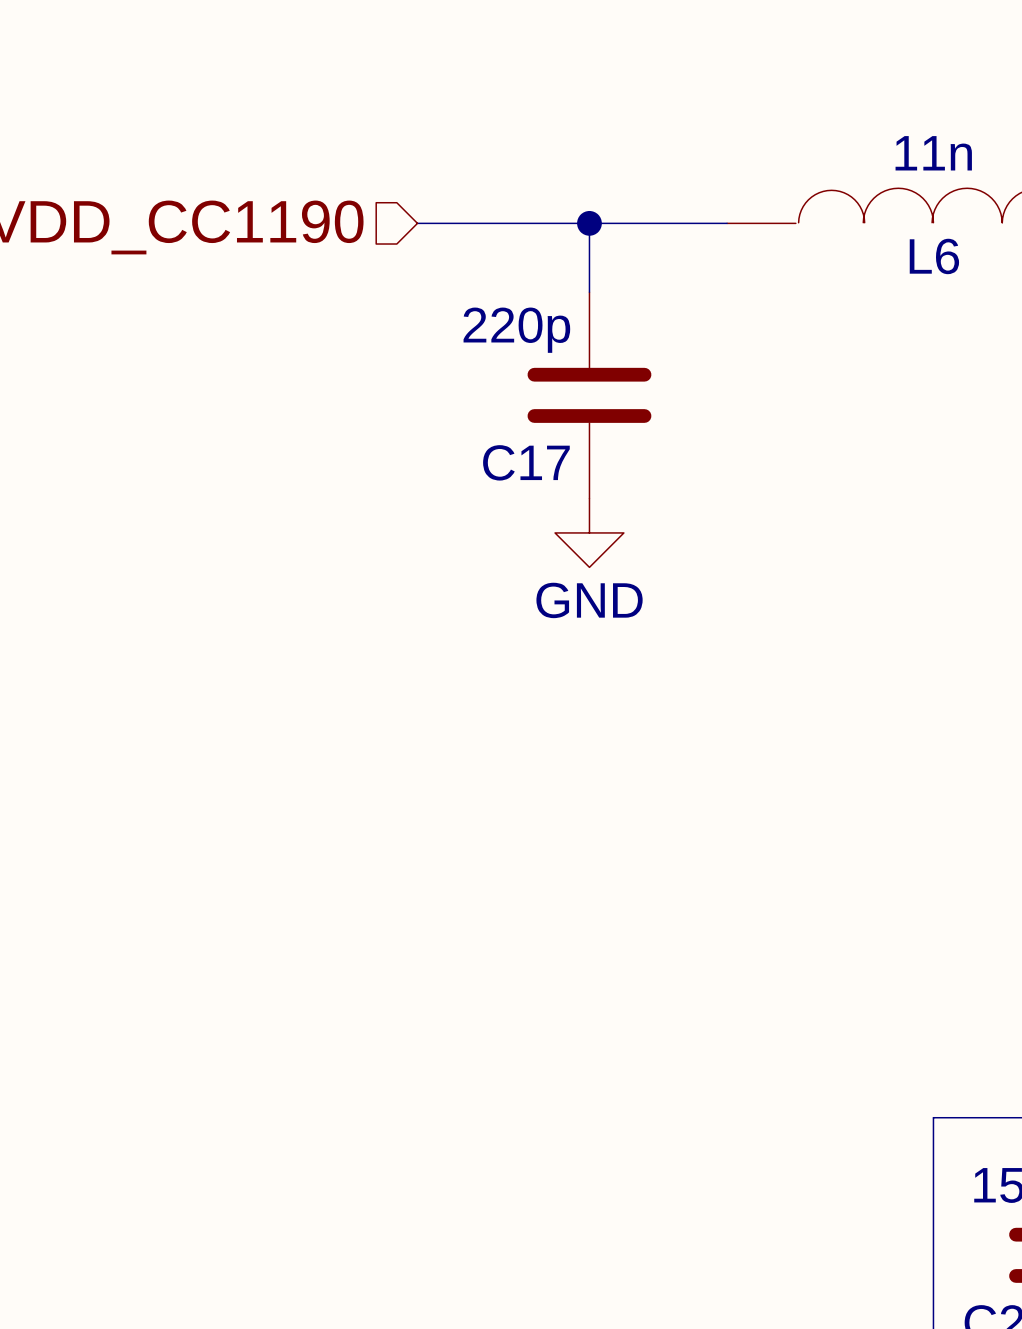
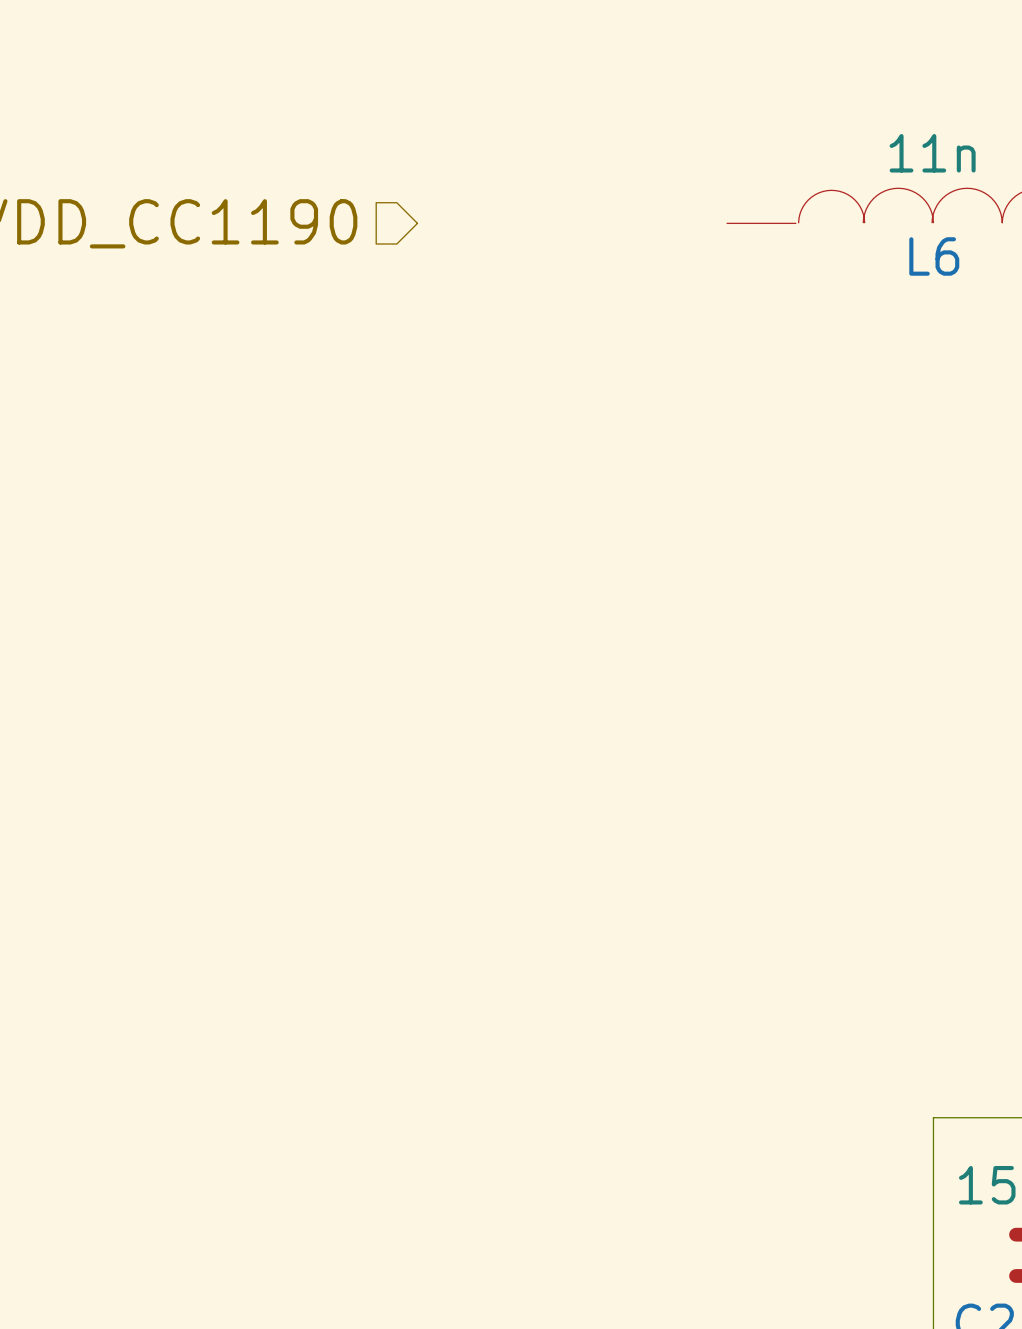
wire: (417, 223) (727, 223) -> none
wire: (589, 223) (589, 292) -> none
junction: (589, 223) -> none
C17: 220p (589, 395) -> none
power symbol: GND (589, 532) -> none

